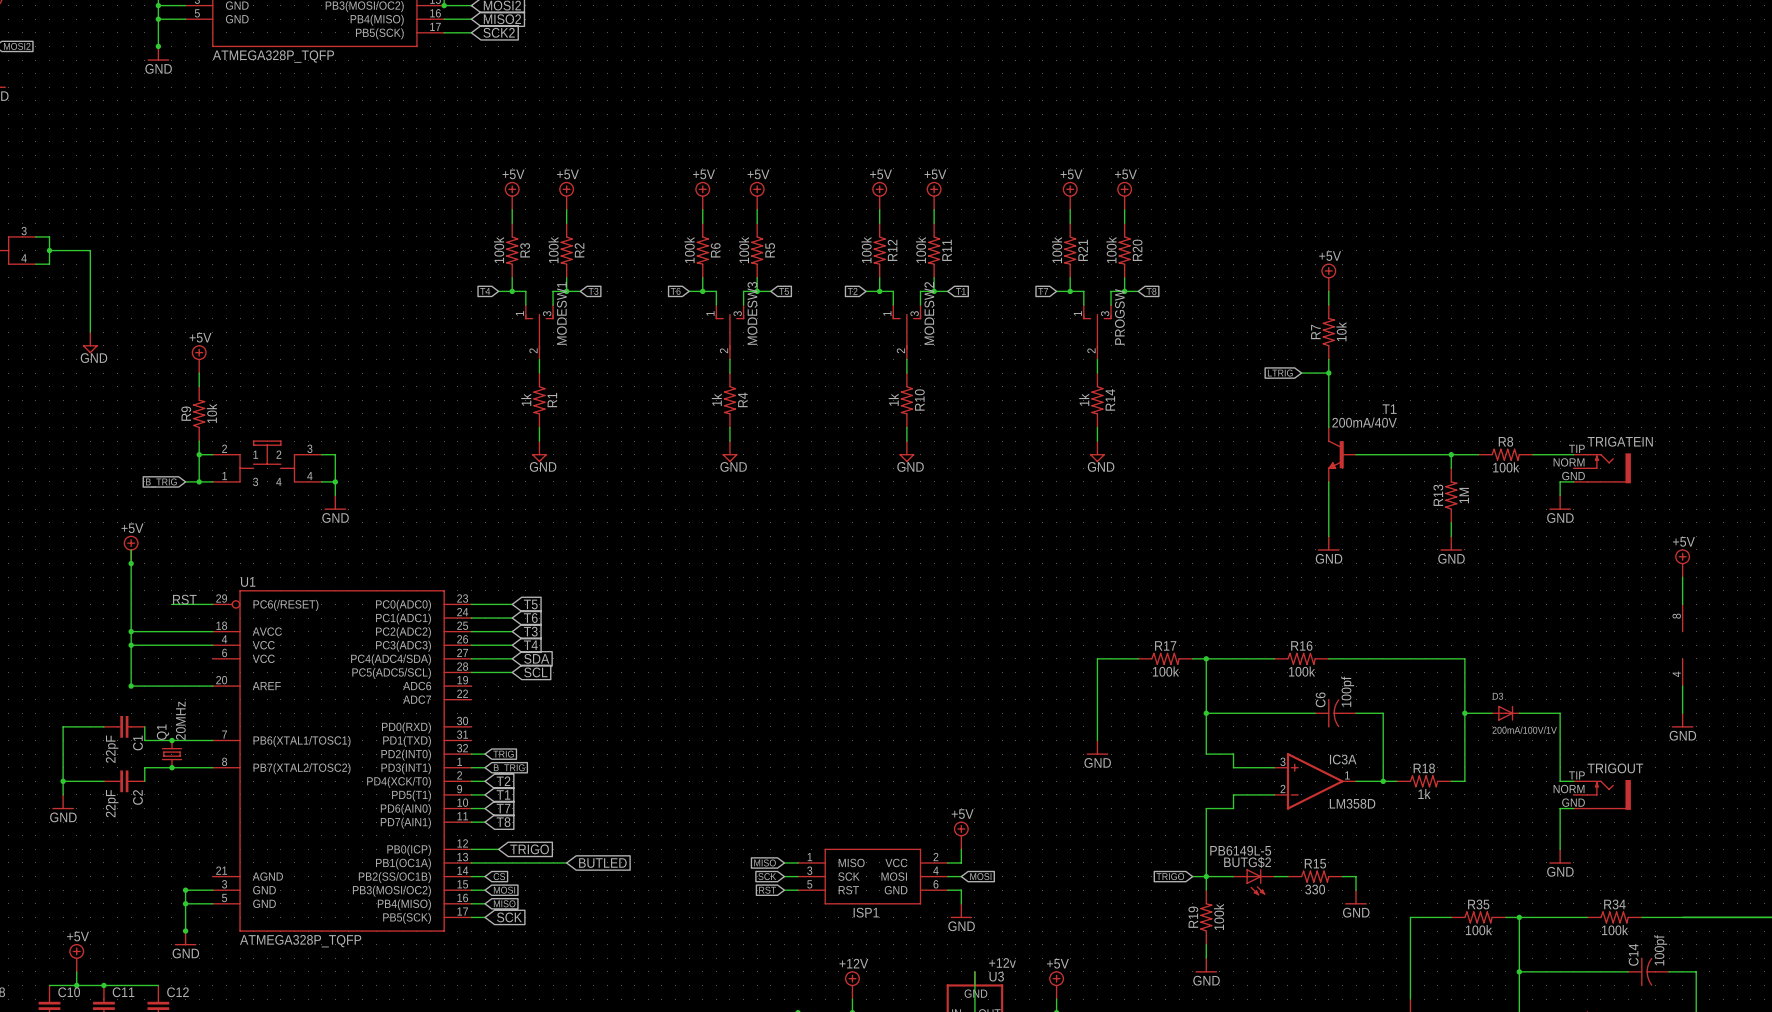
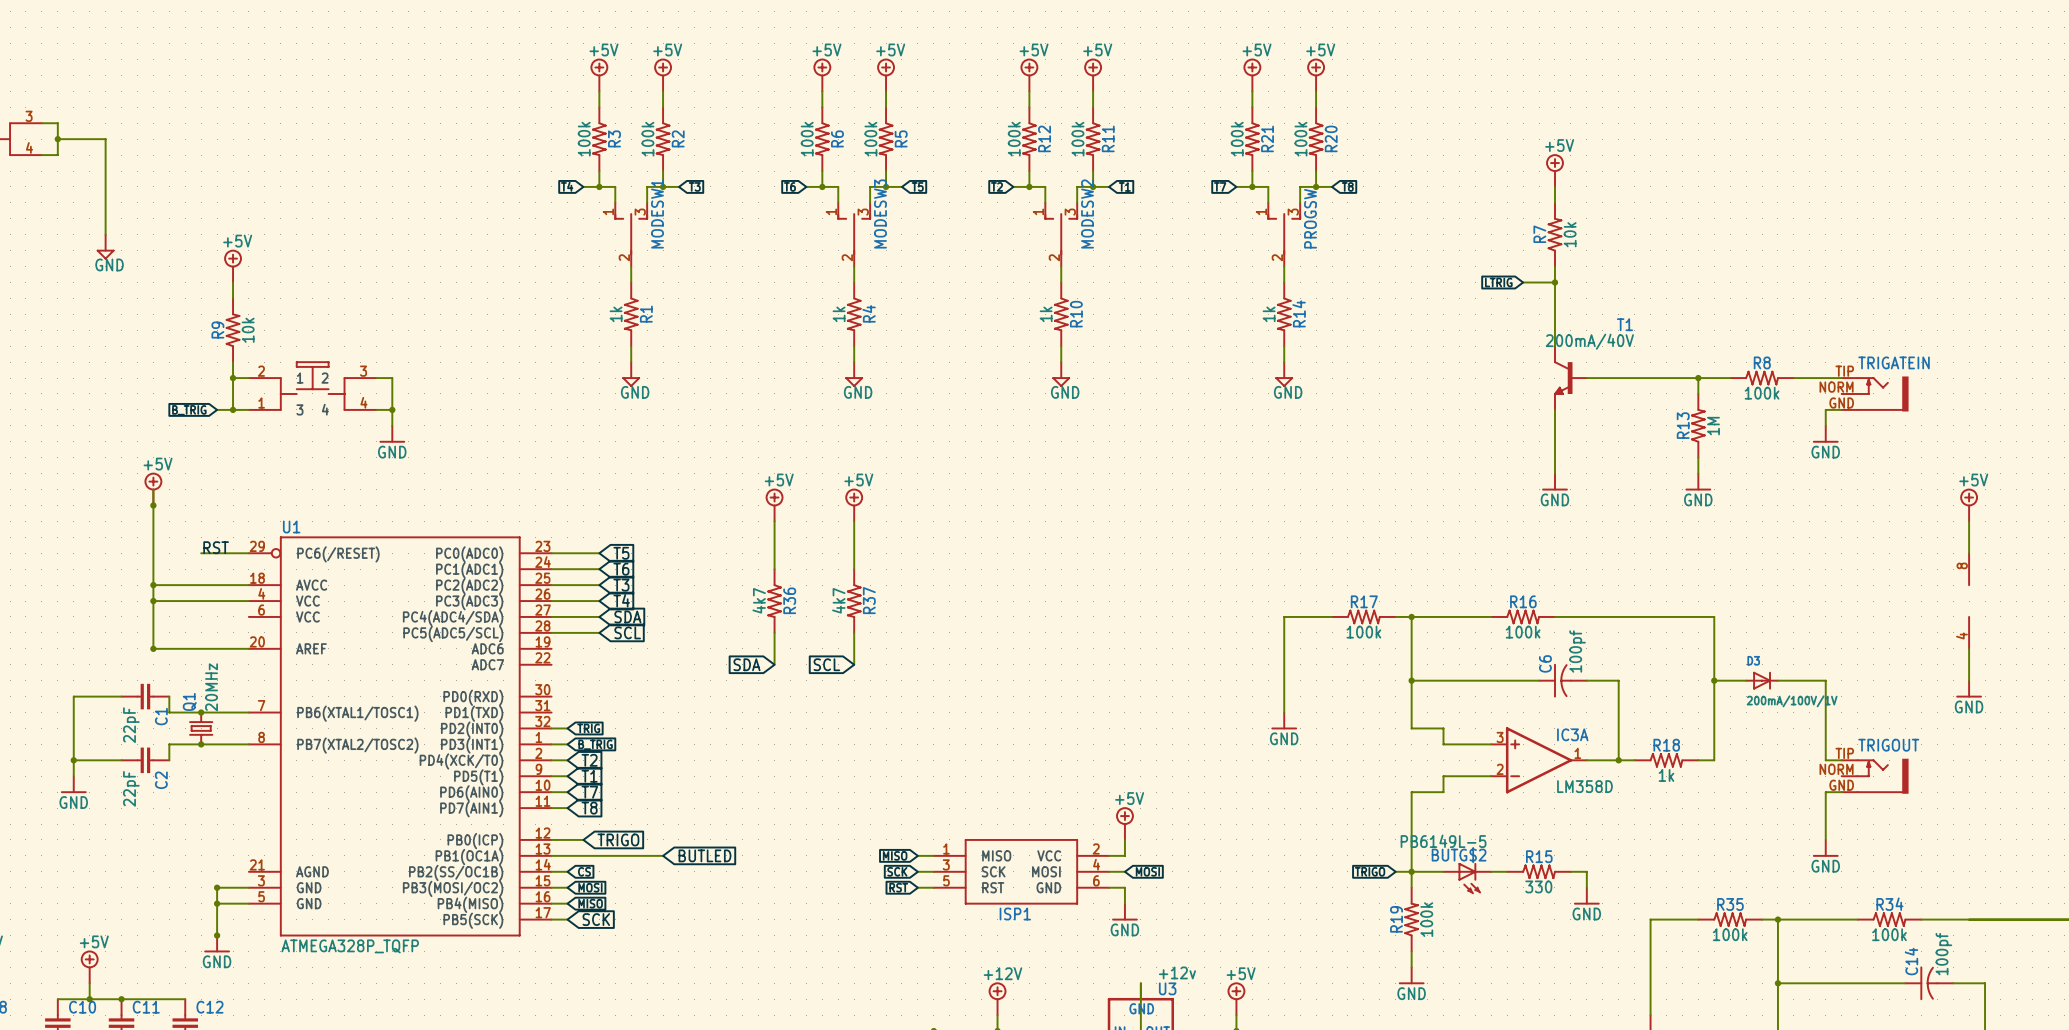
power symbol: none -> +5V (774, 505)
power symbol: none -> +5V (854, 505)
wire: none -> (774, 521) (774, 569)
wire: none -> (854, 521) (854, 569)
R36: none -> 4k7 (774, 601)
R37: none -> 4k7 (854, 601)
wire: none -> (774, 632) (774, 664)
wire: none -> (854, 632) (854, 664)
global label: none -> SDA (746, 664)
global label: none -> SCL (826, 664)

